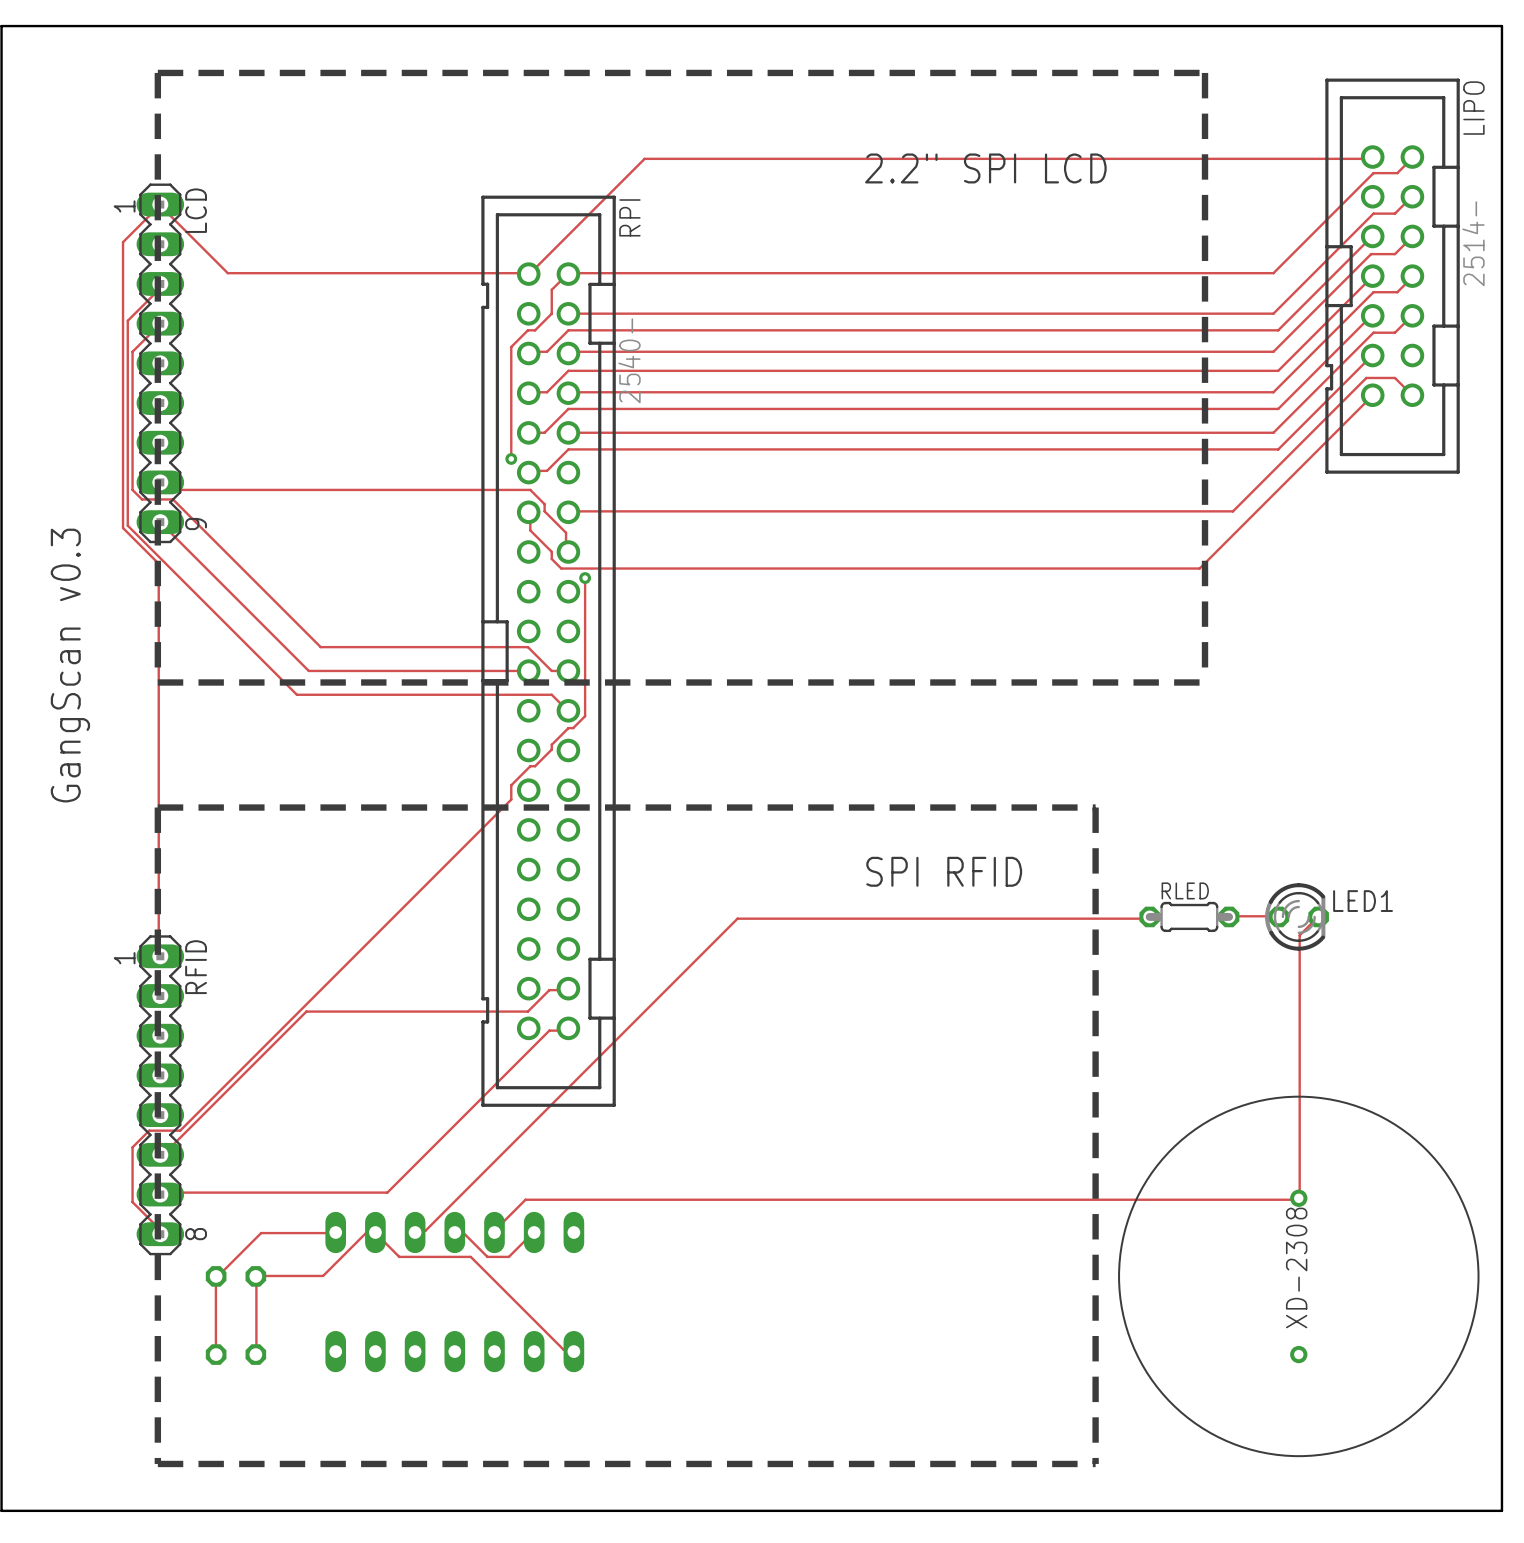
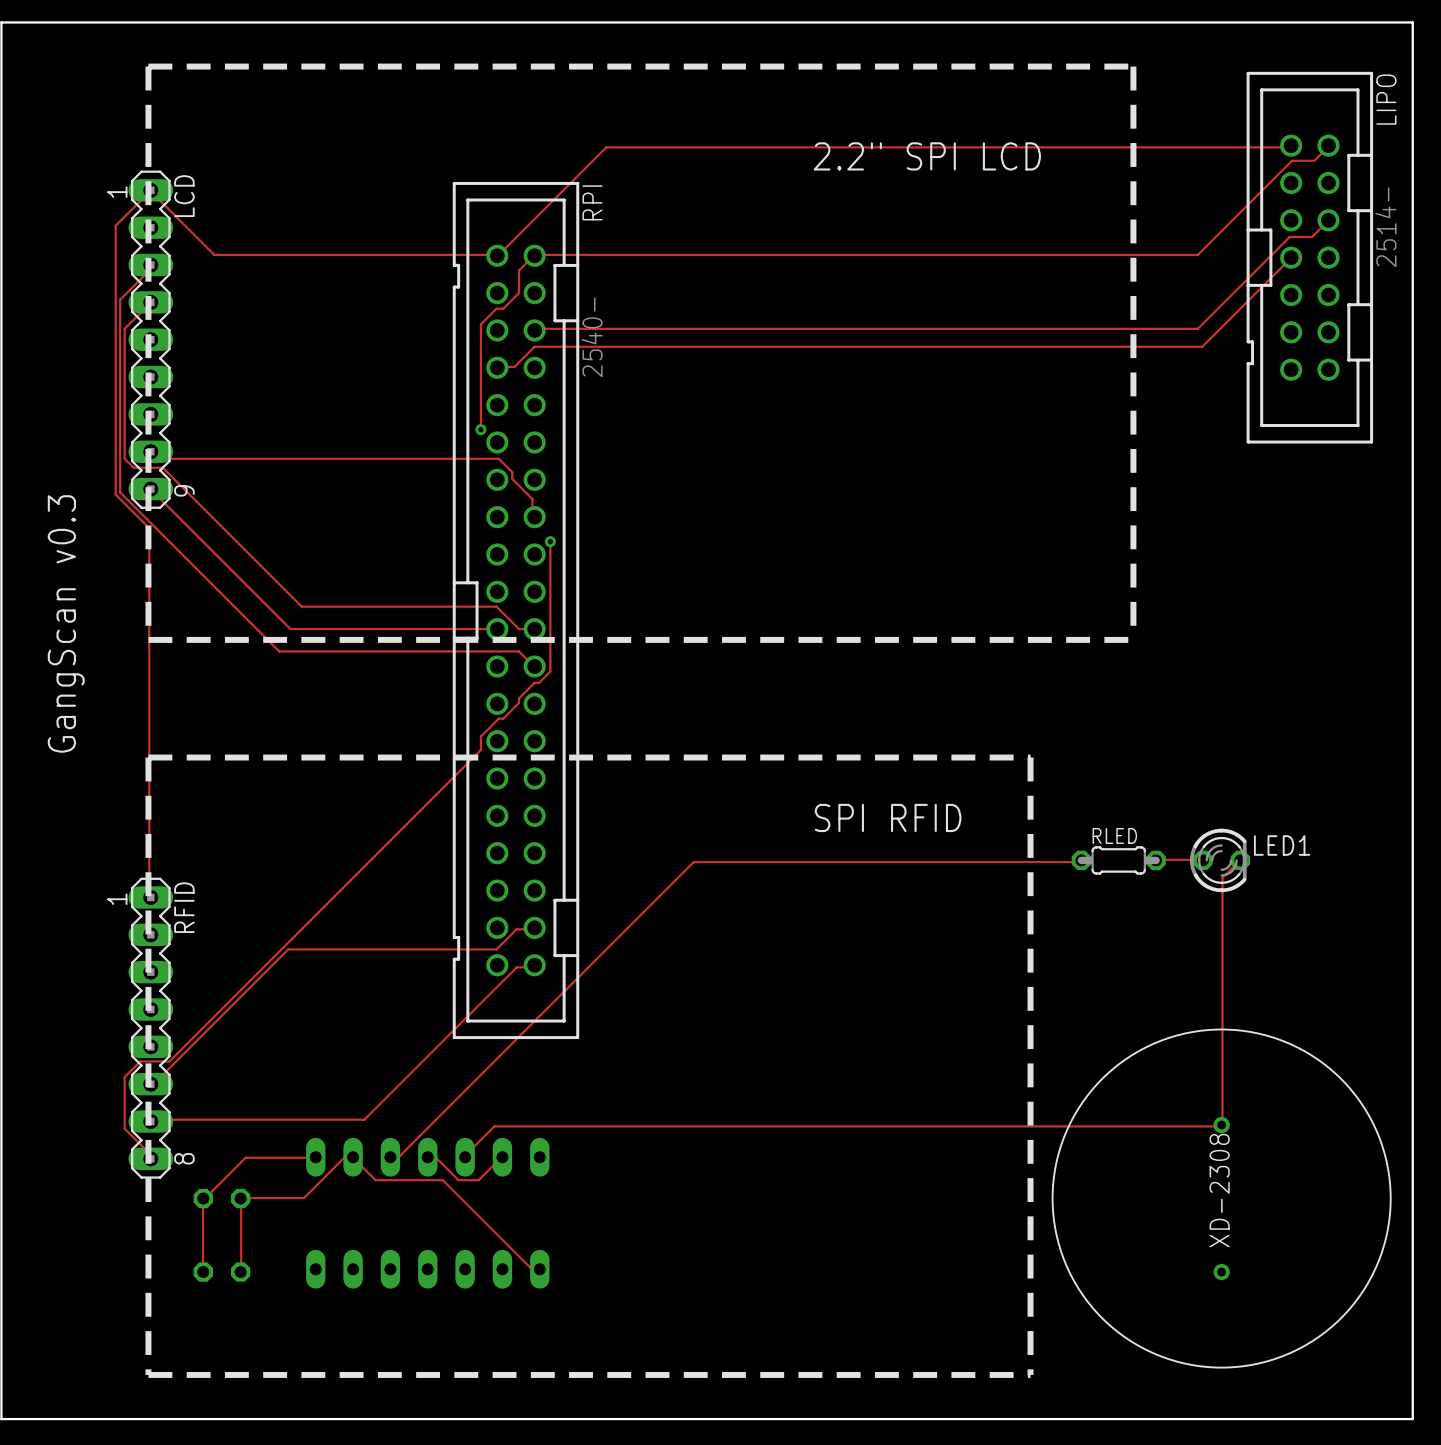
track: (1412, 196) (1394, 213) (1373, 213) (1273, 313) (568, 313) -> none
track: (1372, 236) (1278, 330) (568, 330) (547, 351) (530, 351) (528, 353) -> none
track: (1412, 276) (1397, 292) (1373, 292) (1273, 392) (568, 393) -> none
track: (1372, 315) (1278, 408) (568, 408) (544, 432) (528, 432) -> none
track: (1412, 315) (1394, 332) (1373, 332) (1273, 432) (568, 432) -> none
track: (1372, 355) (1278, 449) (568, 449) (547, 470) (530, 470) (528, 472) -> none
track: (1372, 395) (1199, 568) (561, 568) (551, 559) (551, 551) (530, 530) (528, 512) -> none
track: (1412, 395) (1394, 377) (1366, 377) (1232, 511) (568, 512) -> none

